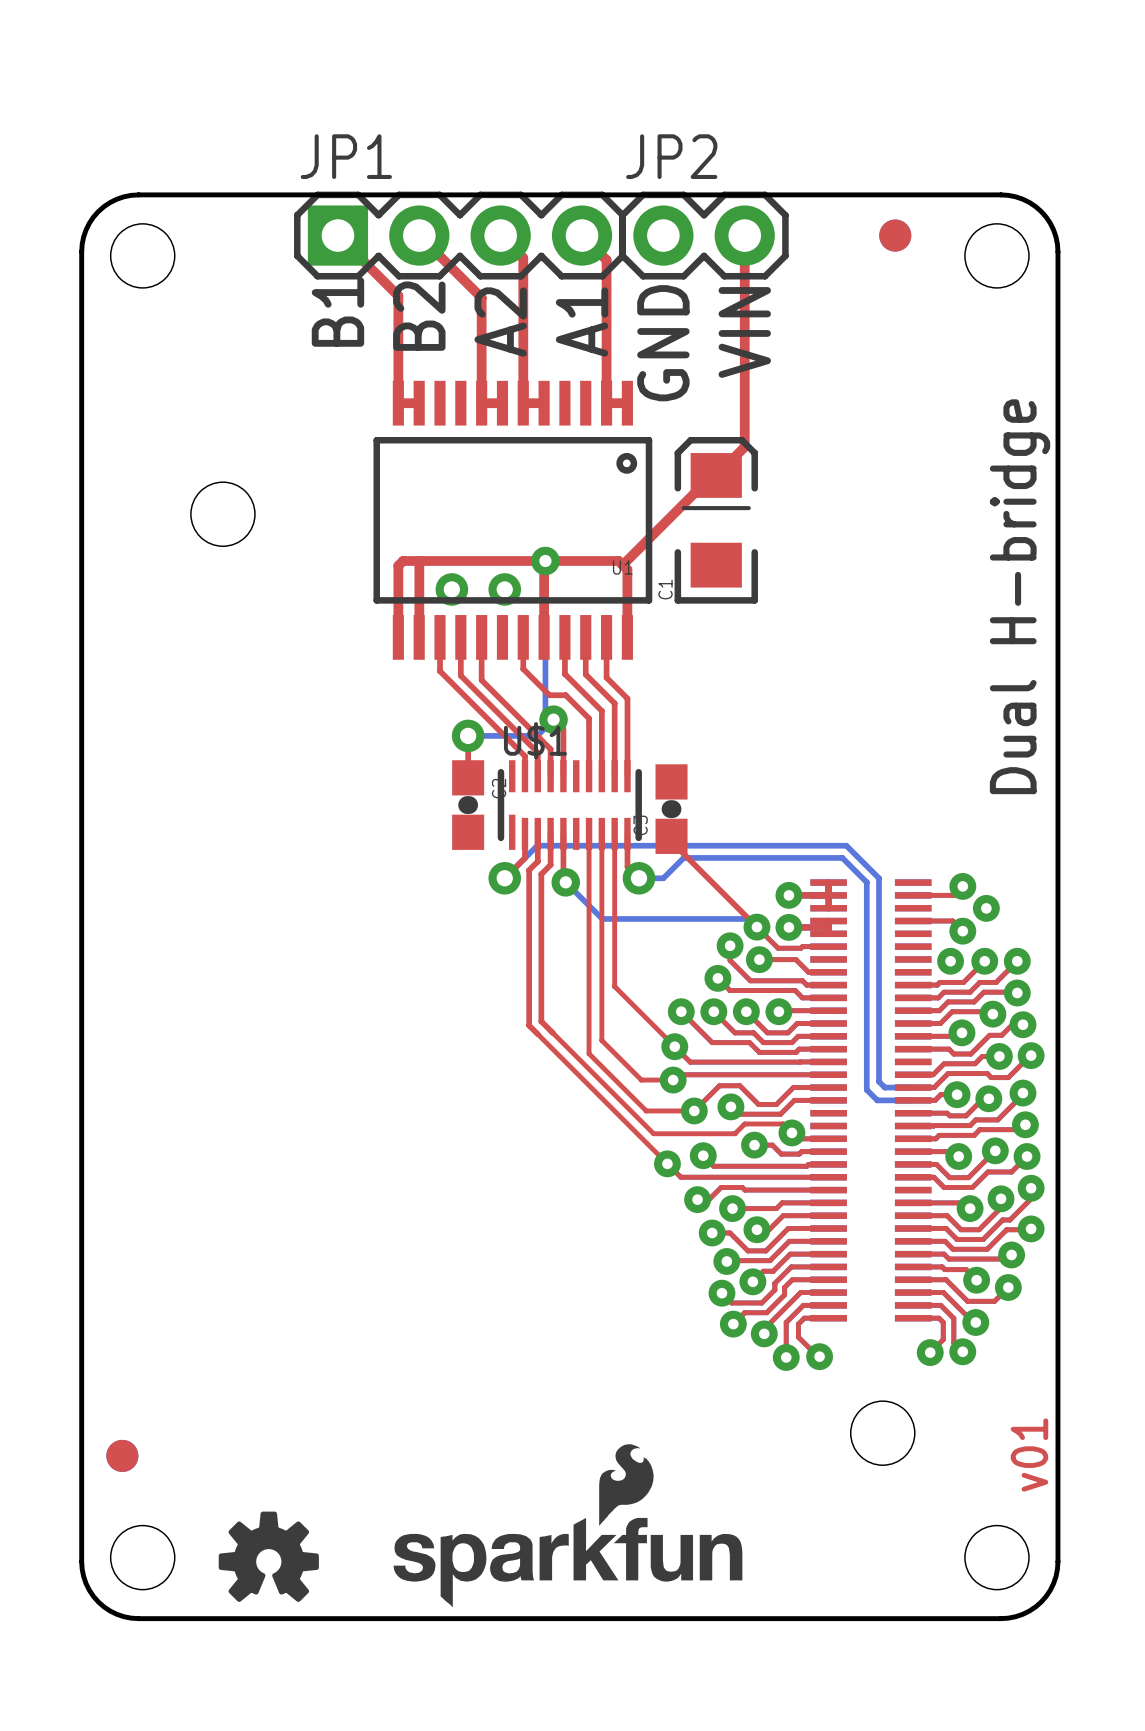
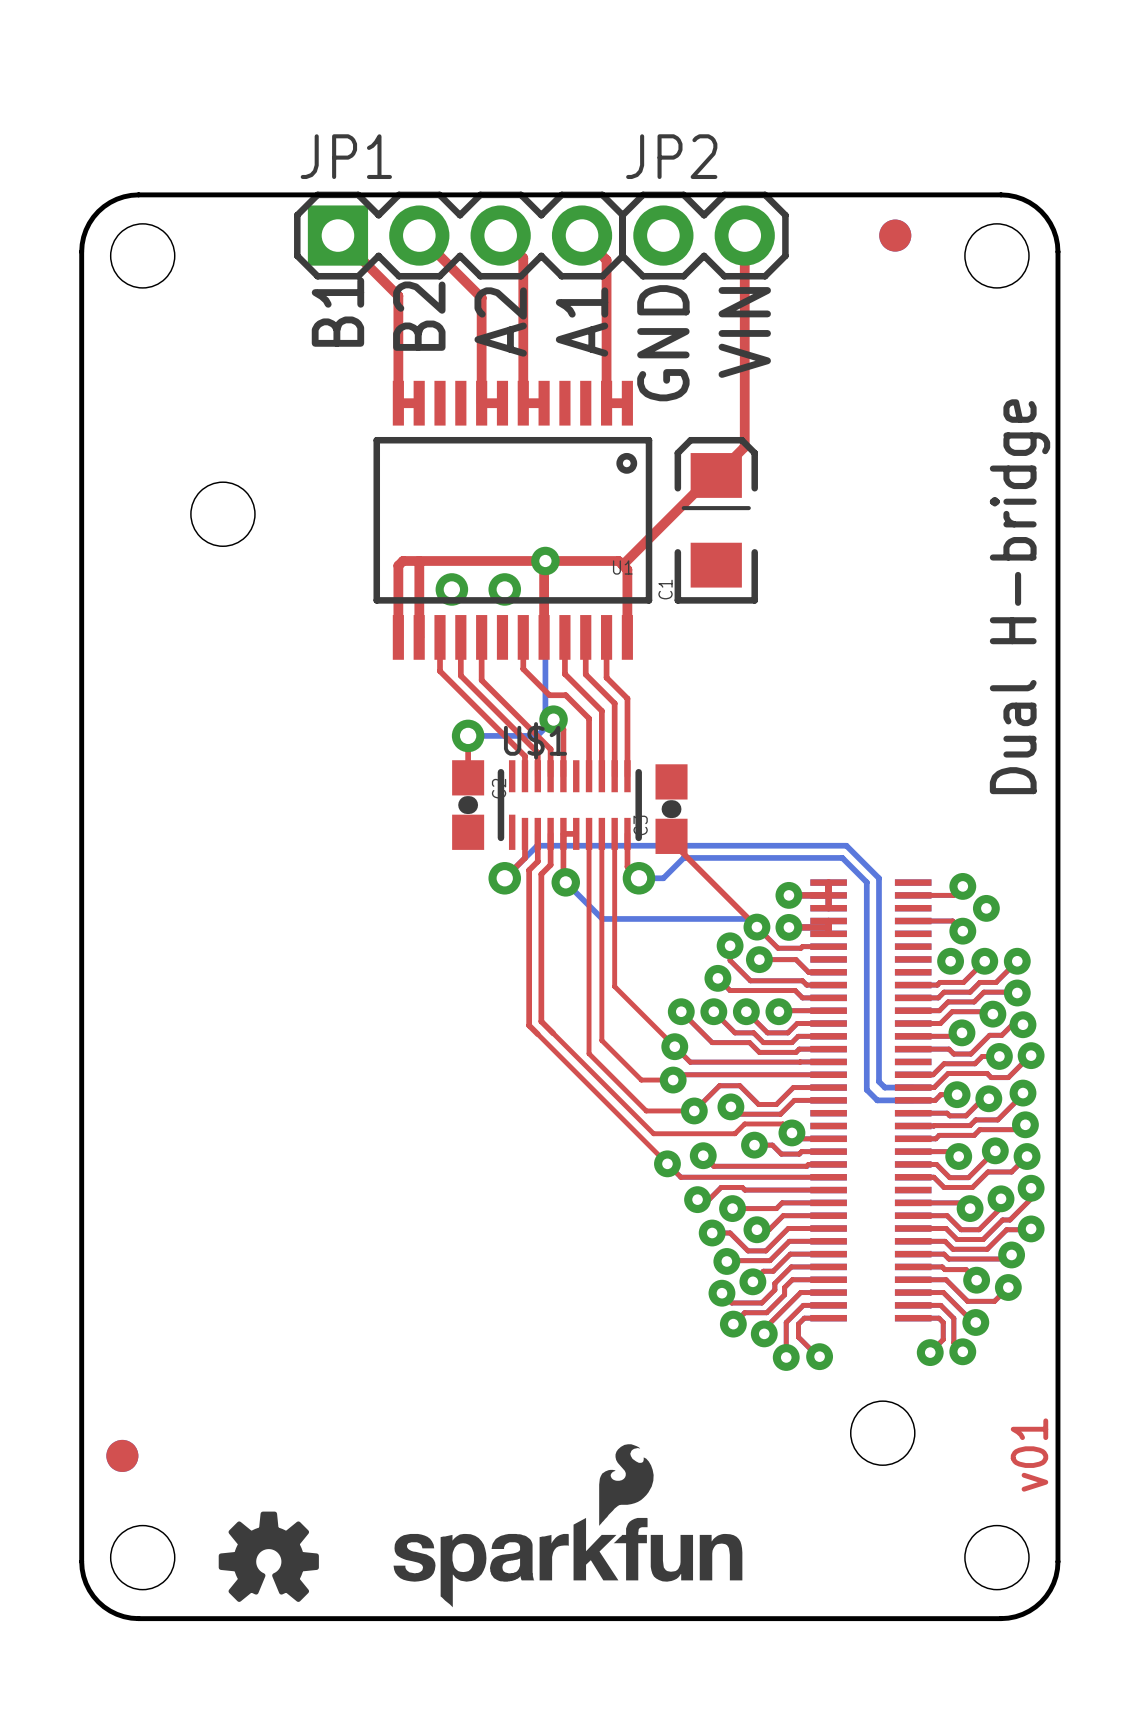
top track: none -> (563, 833) (576, 833)

